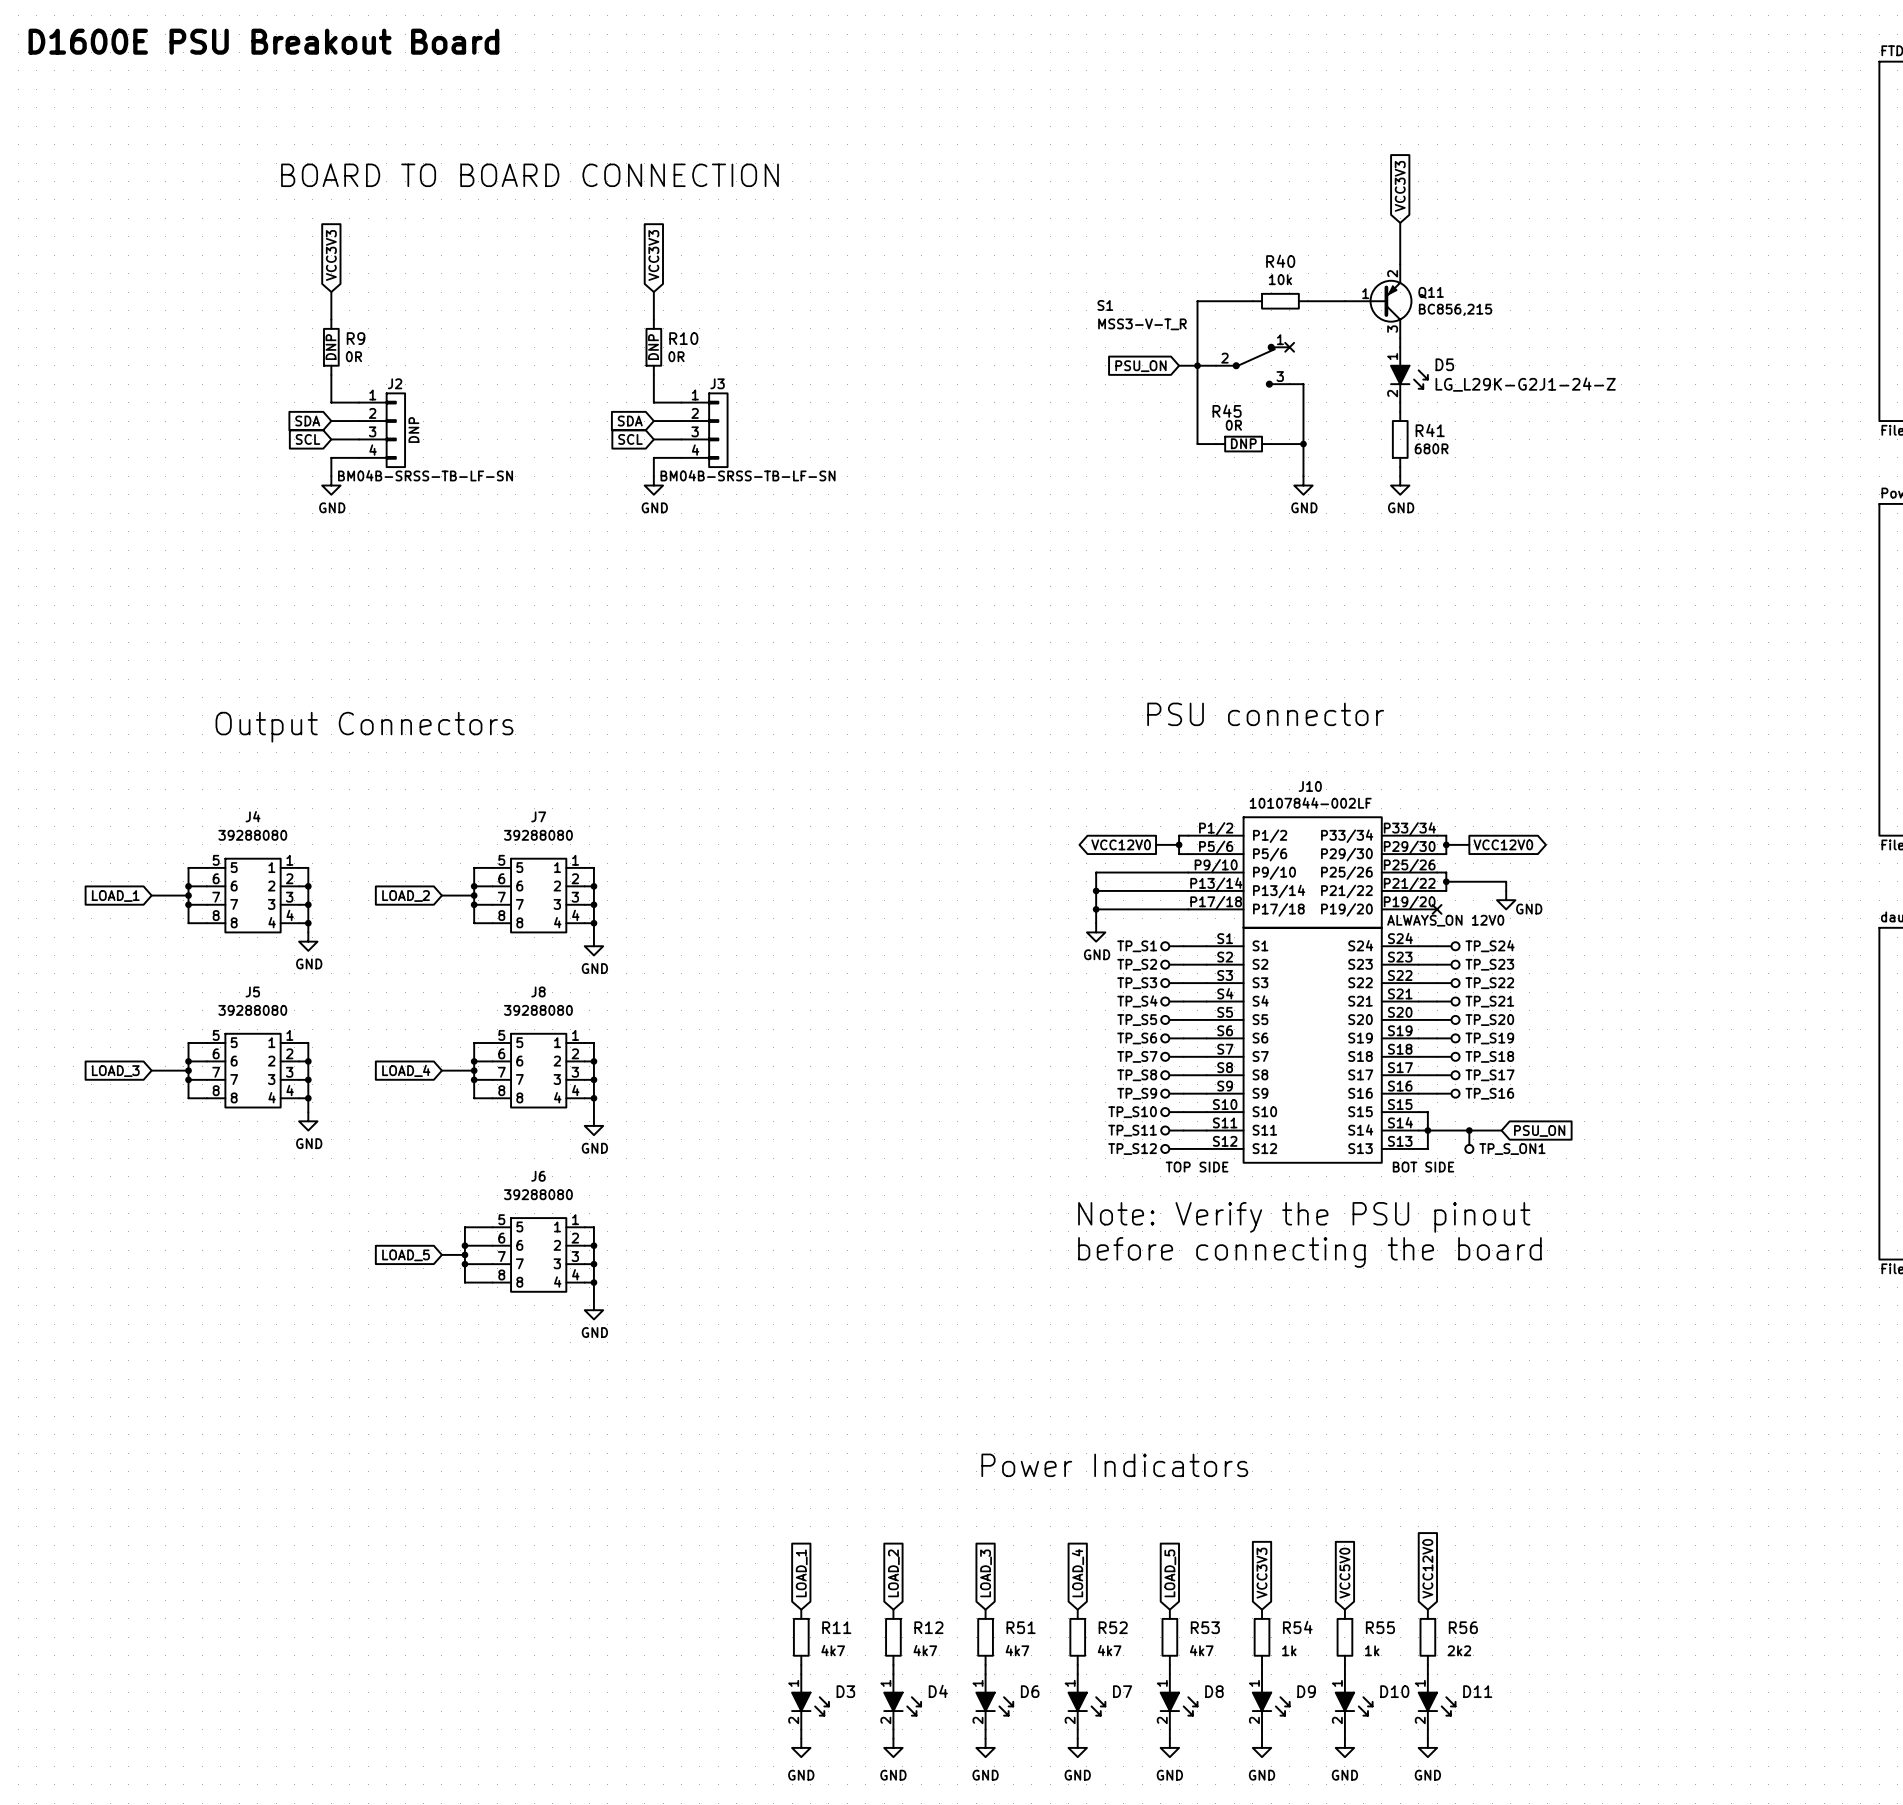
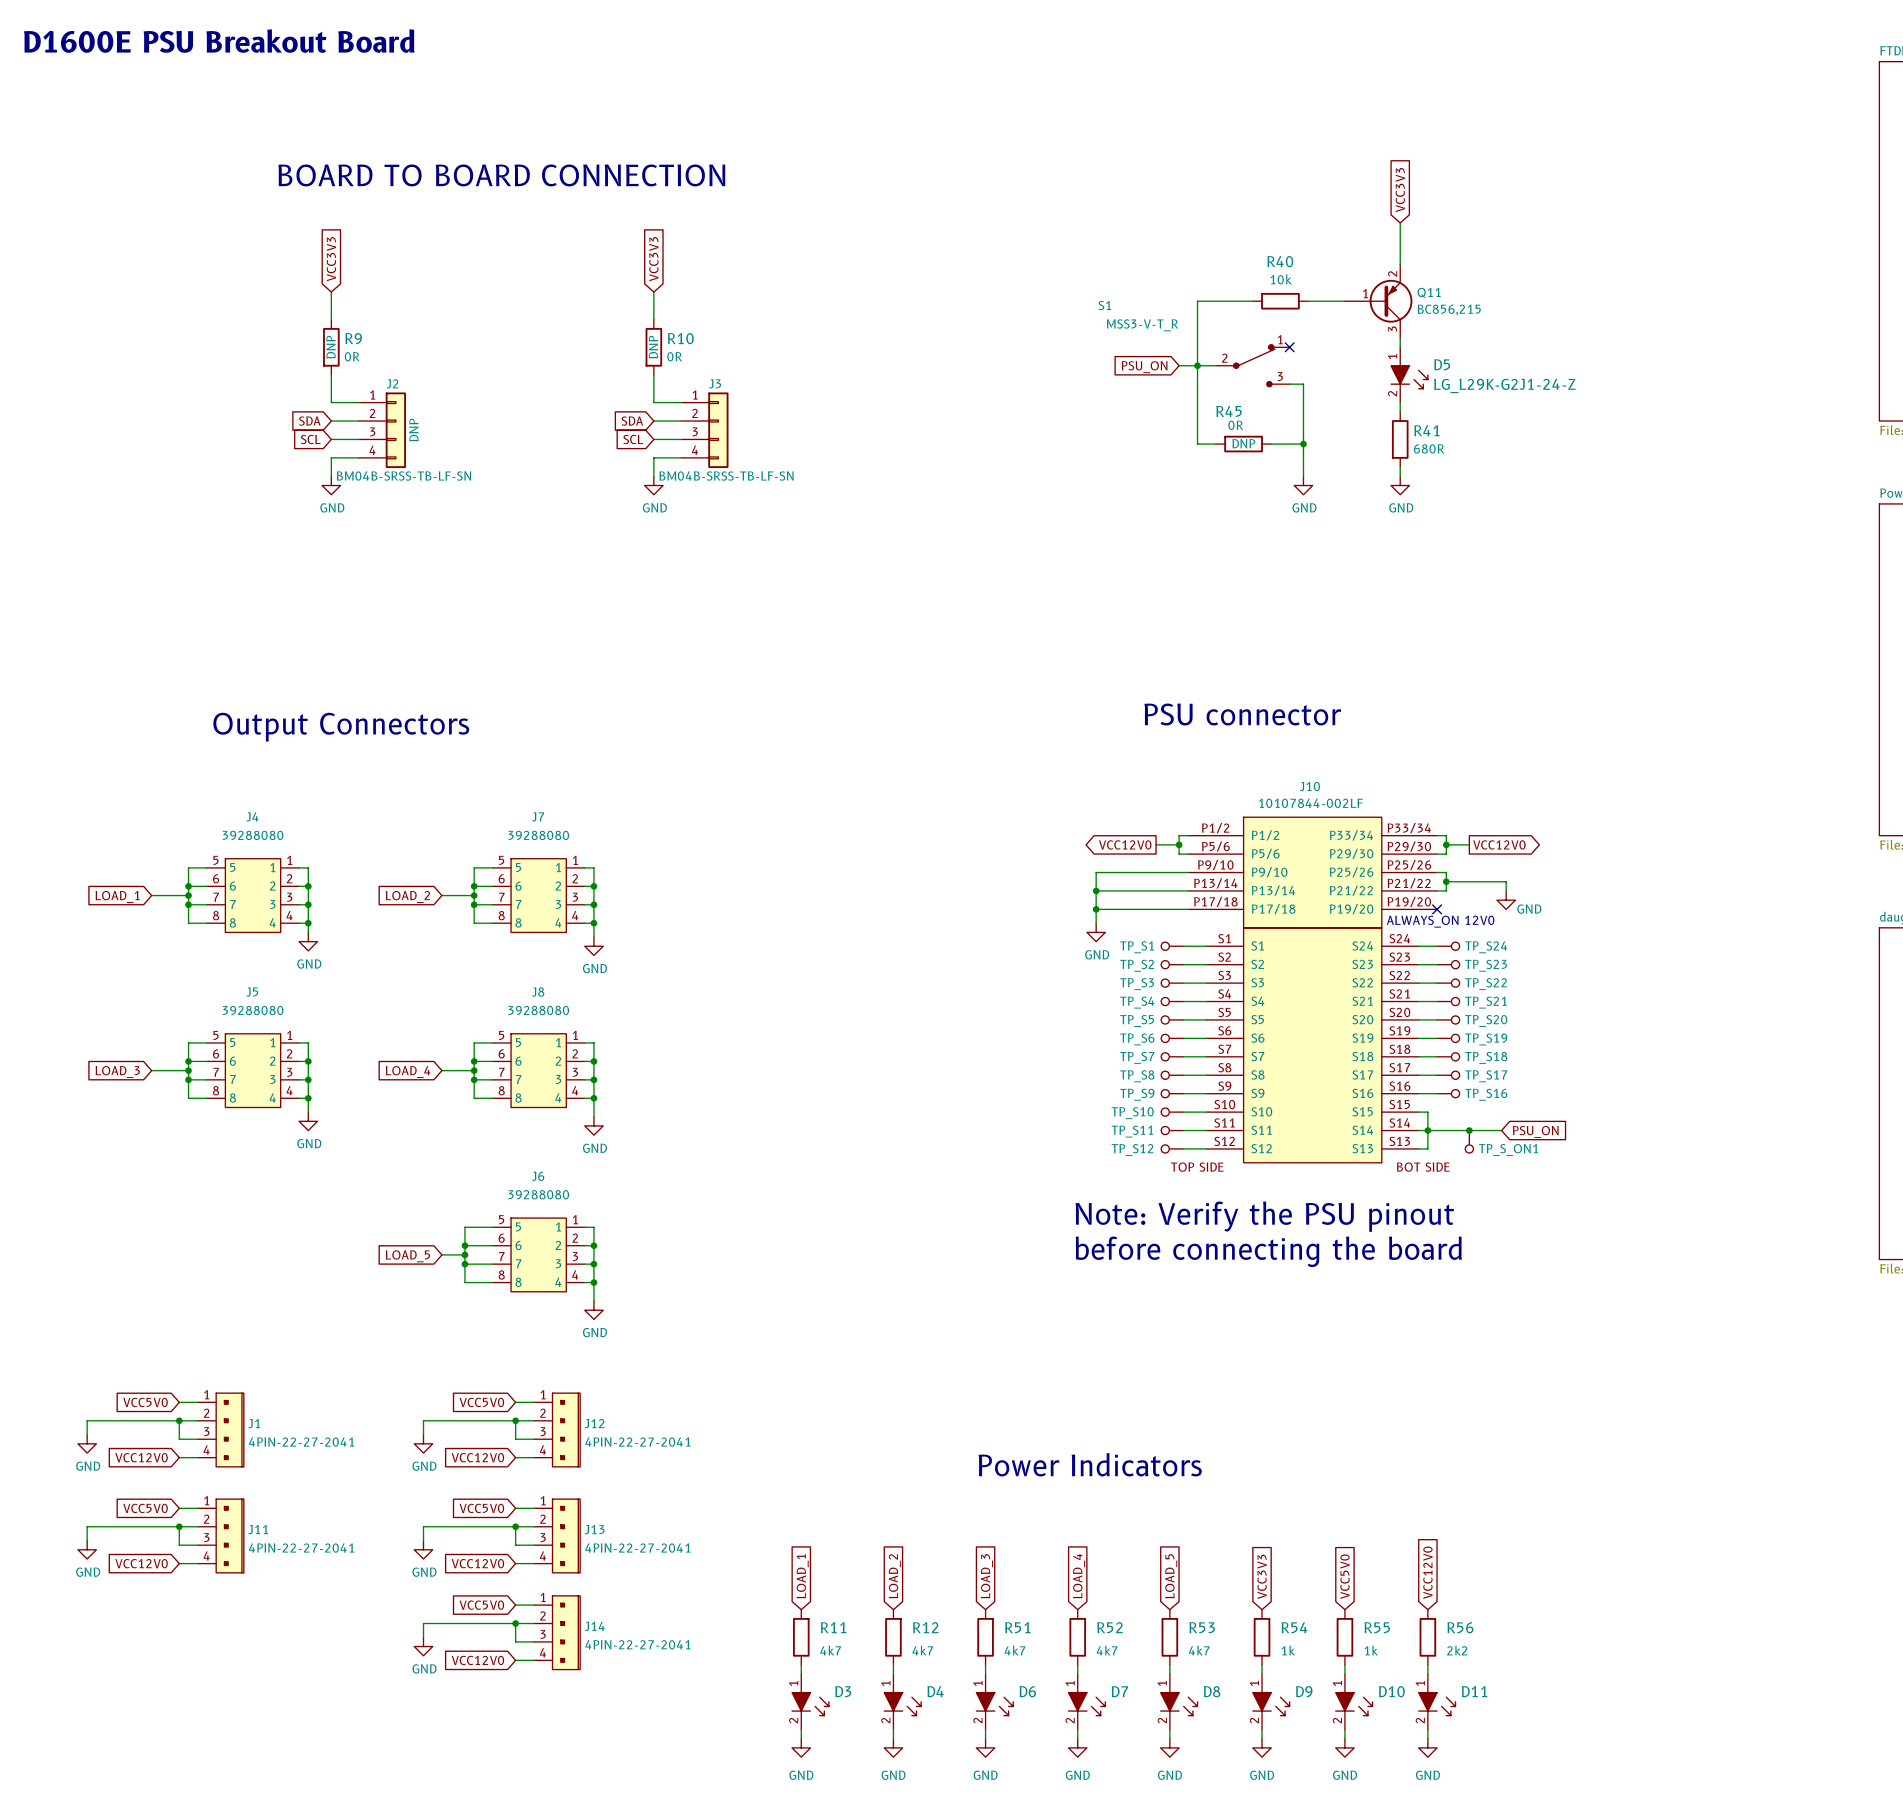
global label: none -> VCC5V0 (145, 1402)
wire: none -> (179, 1402) (197, 1402)
global label: none -> VCC5V0 (481, 1402)
wire: none -> (515, 1402) (534, 1402)
wire: none -> (179, 1420) (179, 1439) (197, 1439)
junction: none -> (179, 1420)
wire: none -> (197, 1420) (87, 1420) (87, 1434)
wire: none -> (515, 1420) (515, 1439) (534, 1439)
junction: none -> (515, 1420)
wire: none -> (534, 1420) (423, 1420) (423, 1434)
J1: none -> 4PIN-22-27-2041 (220, 1430)
J12: none -> 4PIN-22-27-2041 (557, 1430)
power symbol: none -> GND (87, 1443)
power symbol: none -> GND (423, 1443)
global label: none -> VCC12V0 (141, 1457)
wire: none -> (179, 1457) (197, 1457)
global label: none -> VCC12V0 (477, 1457)
wire: none -> (515, 1457) (534, 1457)
global label: none -> VCC5V0 (145, 1508)
wire: none -> (179, 1508) (197, 1508)
global label: none -> VCC5V0 (481, 1508)
wire: none -> (515, 1508) (534, 1508)
wire: none -> (179, 1526) (179, 1545) (197, 1545)
junction: none -> (179, 1526)
wire: none -> (197, 1526) (87, 1526) (87, 1540)
wire: none -> (515, 1526) (515, 1545) (534, 1545)
junction: none -> (515, 1526)
wire: none -> (534, 1526) (423, 1526) (423, 1540)
J11: none -> 4PIN-22-27-2041 (220, 1535)
J13: none -> 4PIN-22-27-2041 (557, 1535)
power symbol: none -> GND (87, 1549)
power symbol: none -> GND (423, 1549)
global label: none -> VCC12V0 (141, 1563)
wire: none -> (179, 1563) (197, 1563)
global label: none -> VCC12V0 (477, 1563)
wire: none -> (515, 1563) (534, 1563)
global label: none -> VCC5V0 (481, 1605)
wire: none -> (515, 1605) (534, 1605)
wire: none -> (515, 1623) (515, 1641) (534, 1641)
junction: none -> (515, 1623)
wire: none -> (534, 1623) (423, 1623) (423, 1637)
J14: none -> 4PIN-22-27-2041 (557, 1632)
power symbol: none -> GND (423, 1646)
global label: none -> VCC12V0 (477, 1660)
wire: none -> (515, 1660) (534, 1660)

